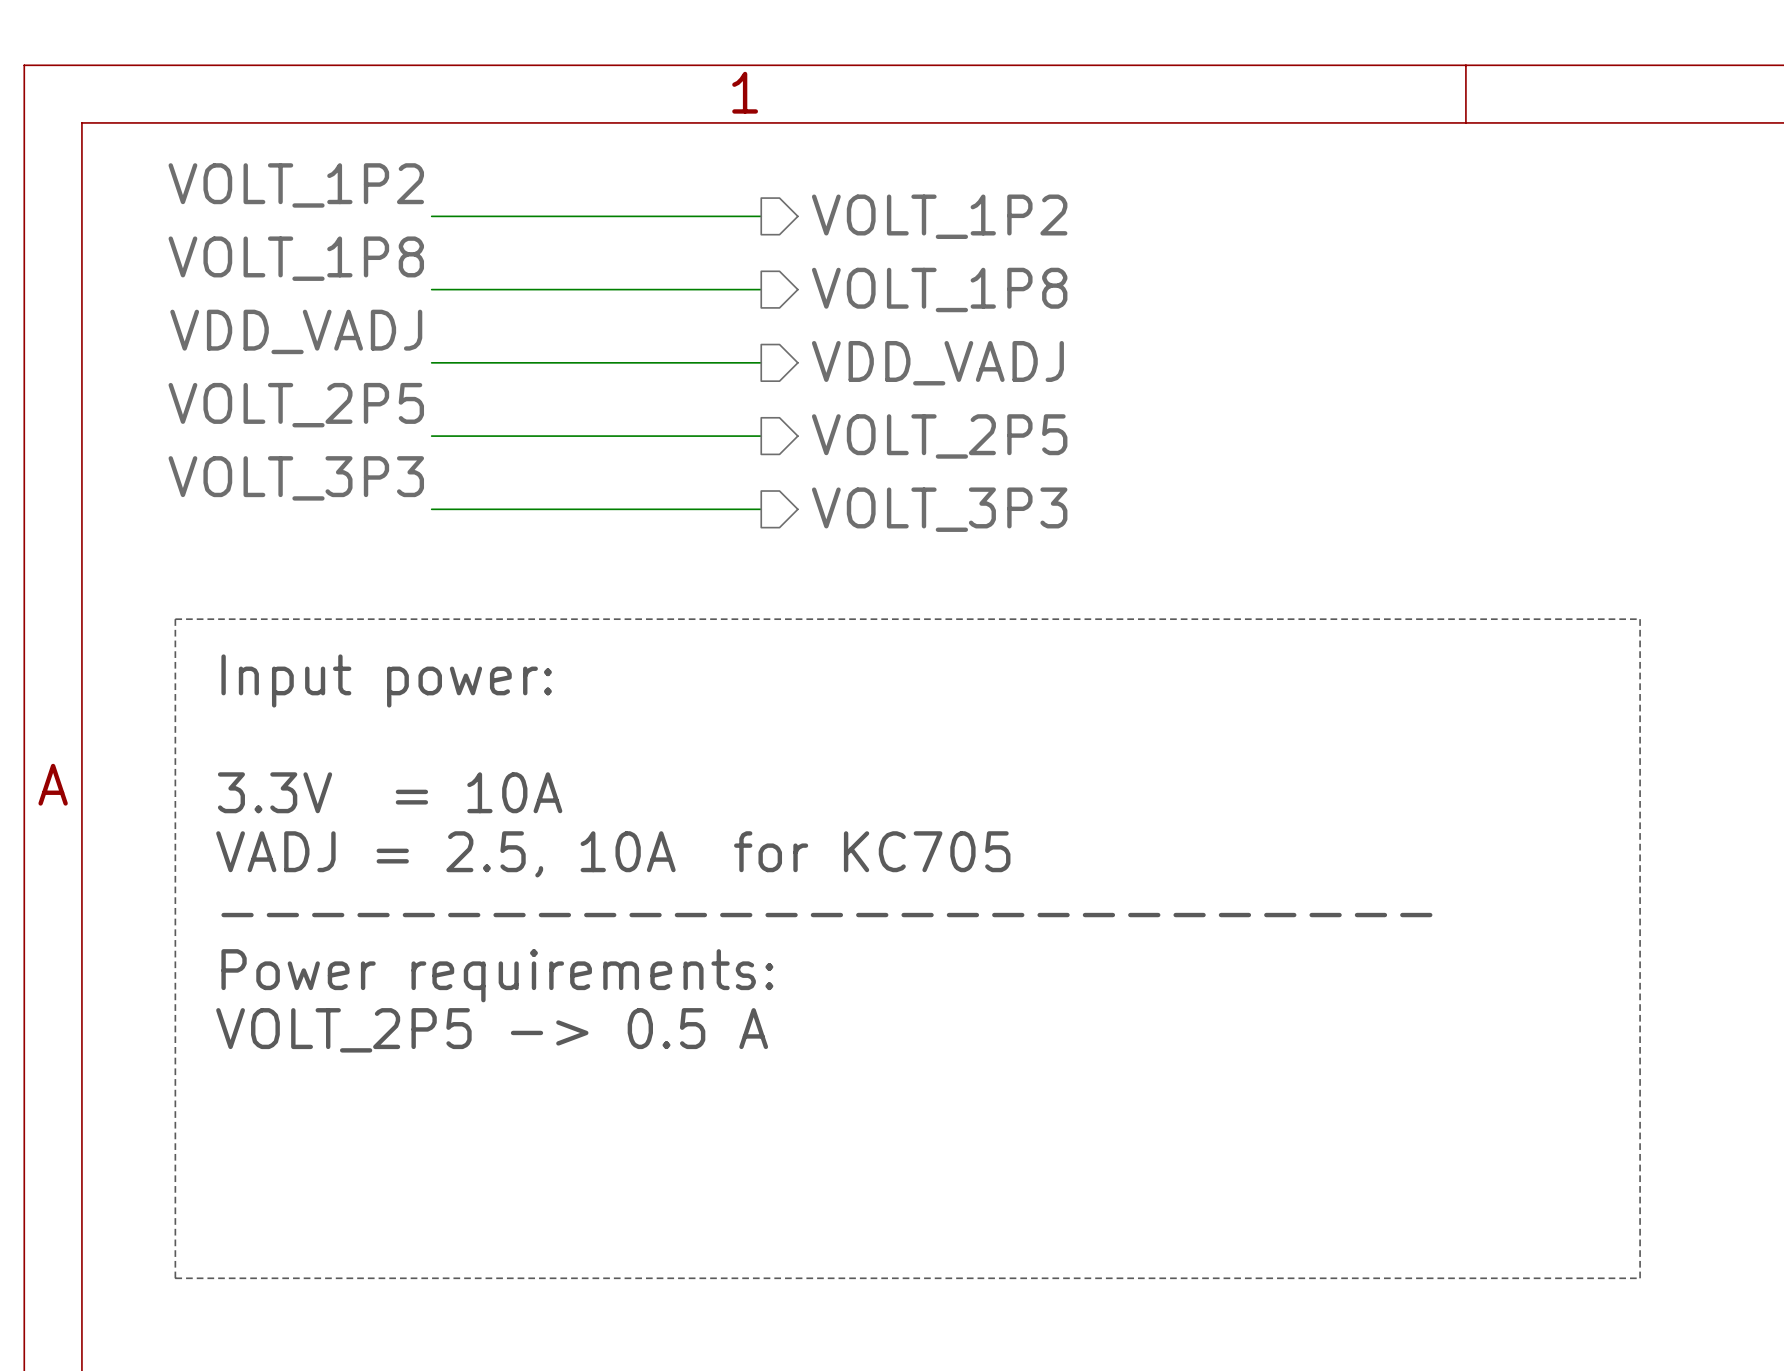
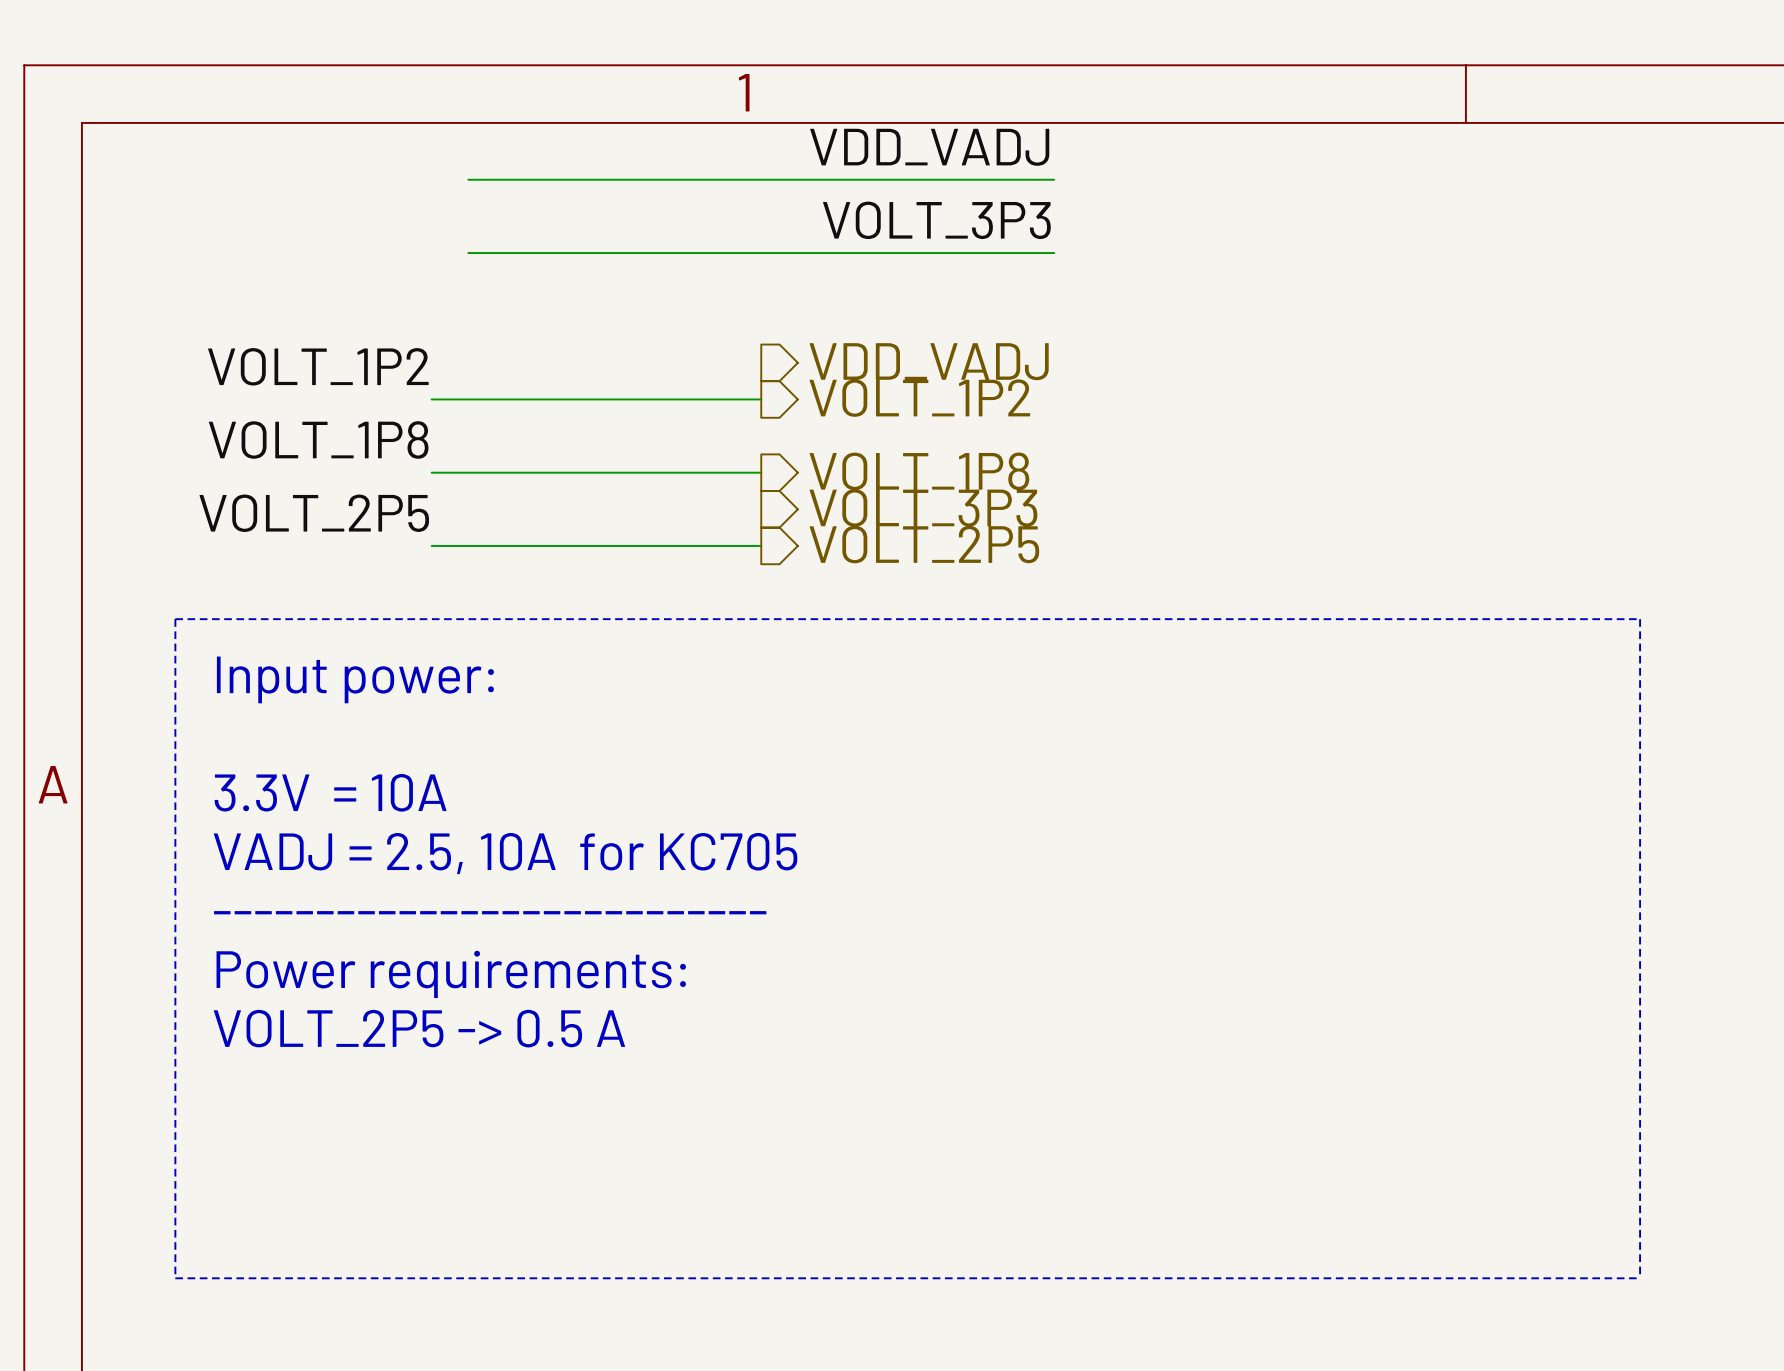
wire: none -> (468, 179) (1054, 179)
label position: VOLT_1P2 (296, 185) -> VOLT_1P2 (318, 366)
wire: (431, 216) (761, 216) -> none
hierarchical label position: VOLT_1P2 (939, 216) -> VOLT_1P2 (919, 398)
wire: none -> (468, 252) (1054, 252)
label position: VOLT_1P8 (296, 258) -> VOLT_1P8 (318, 439)
wire: (431, 289) (761, 289) -> none
hierarchical label position: VOLT_1P8 (939, 289) -> VOLT_1P8 (919, 471)
label position: VDD_VADJ (296, 331) -> VDD_VADJ (929, 147)
wire: (431, 362) (761, 362) -> (431, 399) (761, 399)
label position: VOLT_2P5 (296, 405) -> VOLT_2P5 (314, 513)
wire: (431, 436) (761, 436) -> (431, 472) (761, 472)
hierarchical label position: VOLT_2P5 (939, 436) -> VOLT_2P5 (924, 544)
label position: VOLT_3P3 (296, 478) -> VOLT_3P3 (936, 220)
wire: (431, 509) (761, 509) -> (431, 545) (761, 545)

